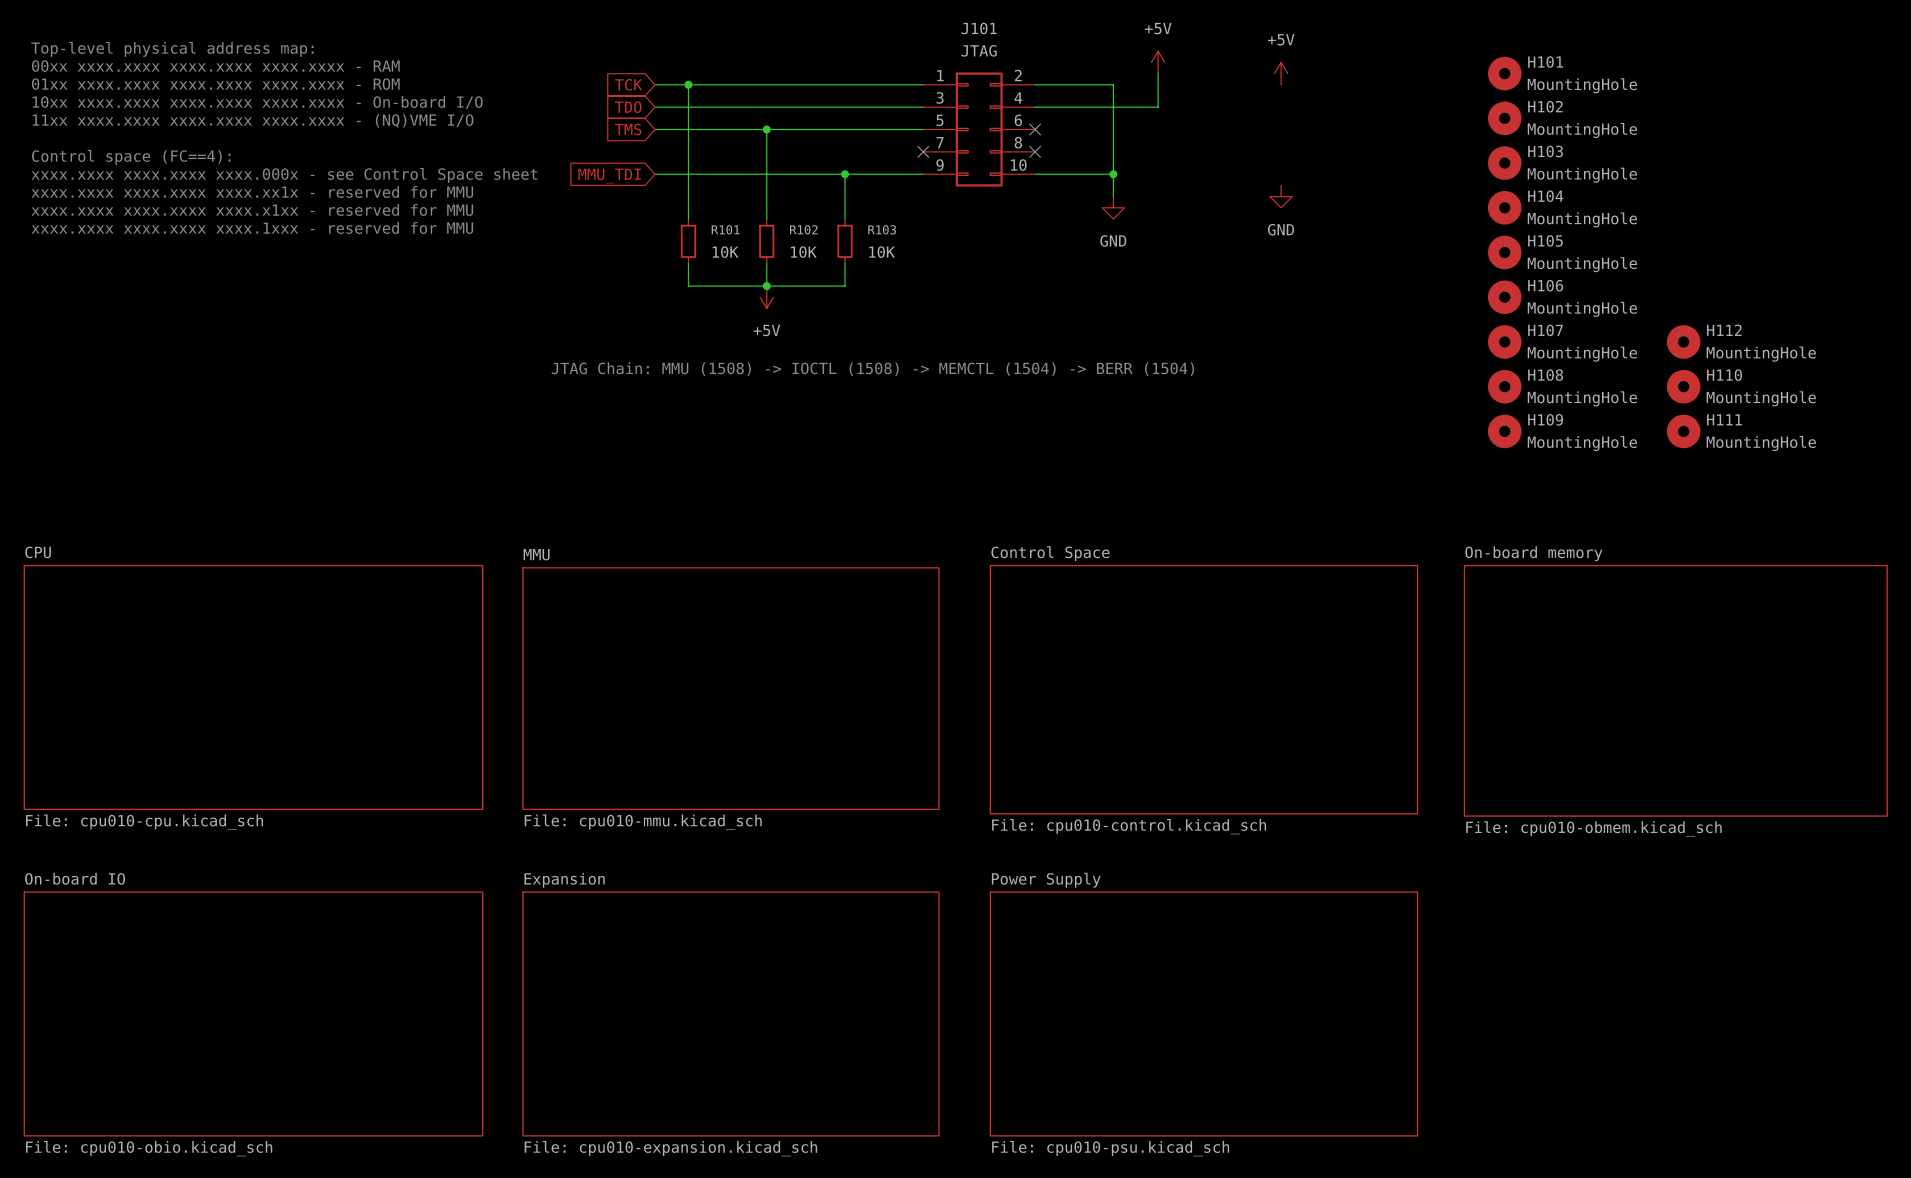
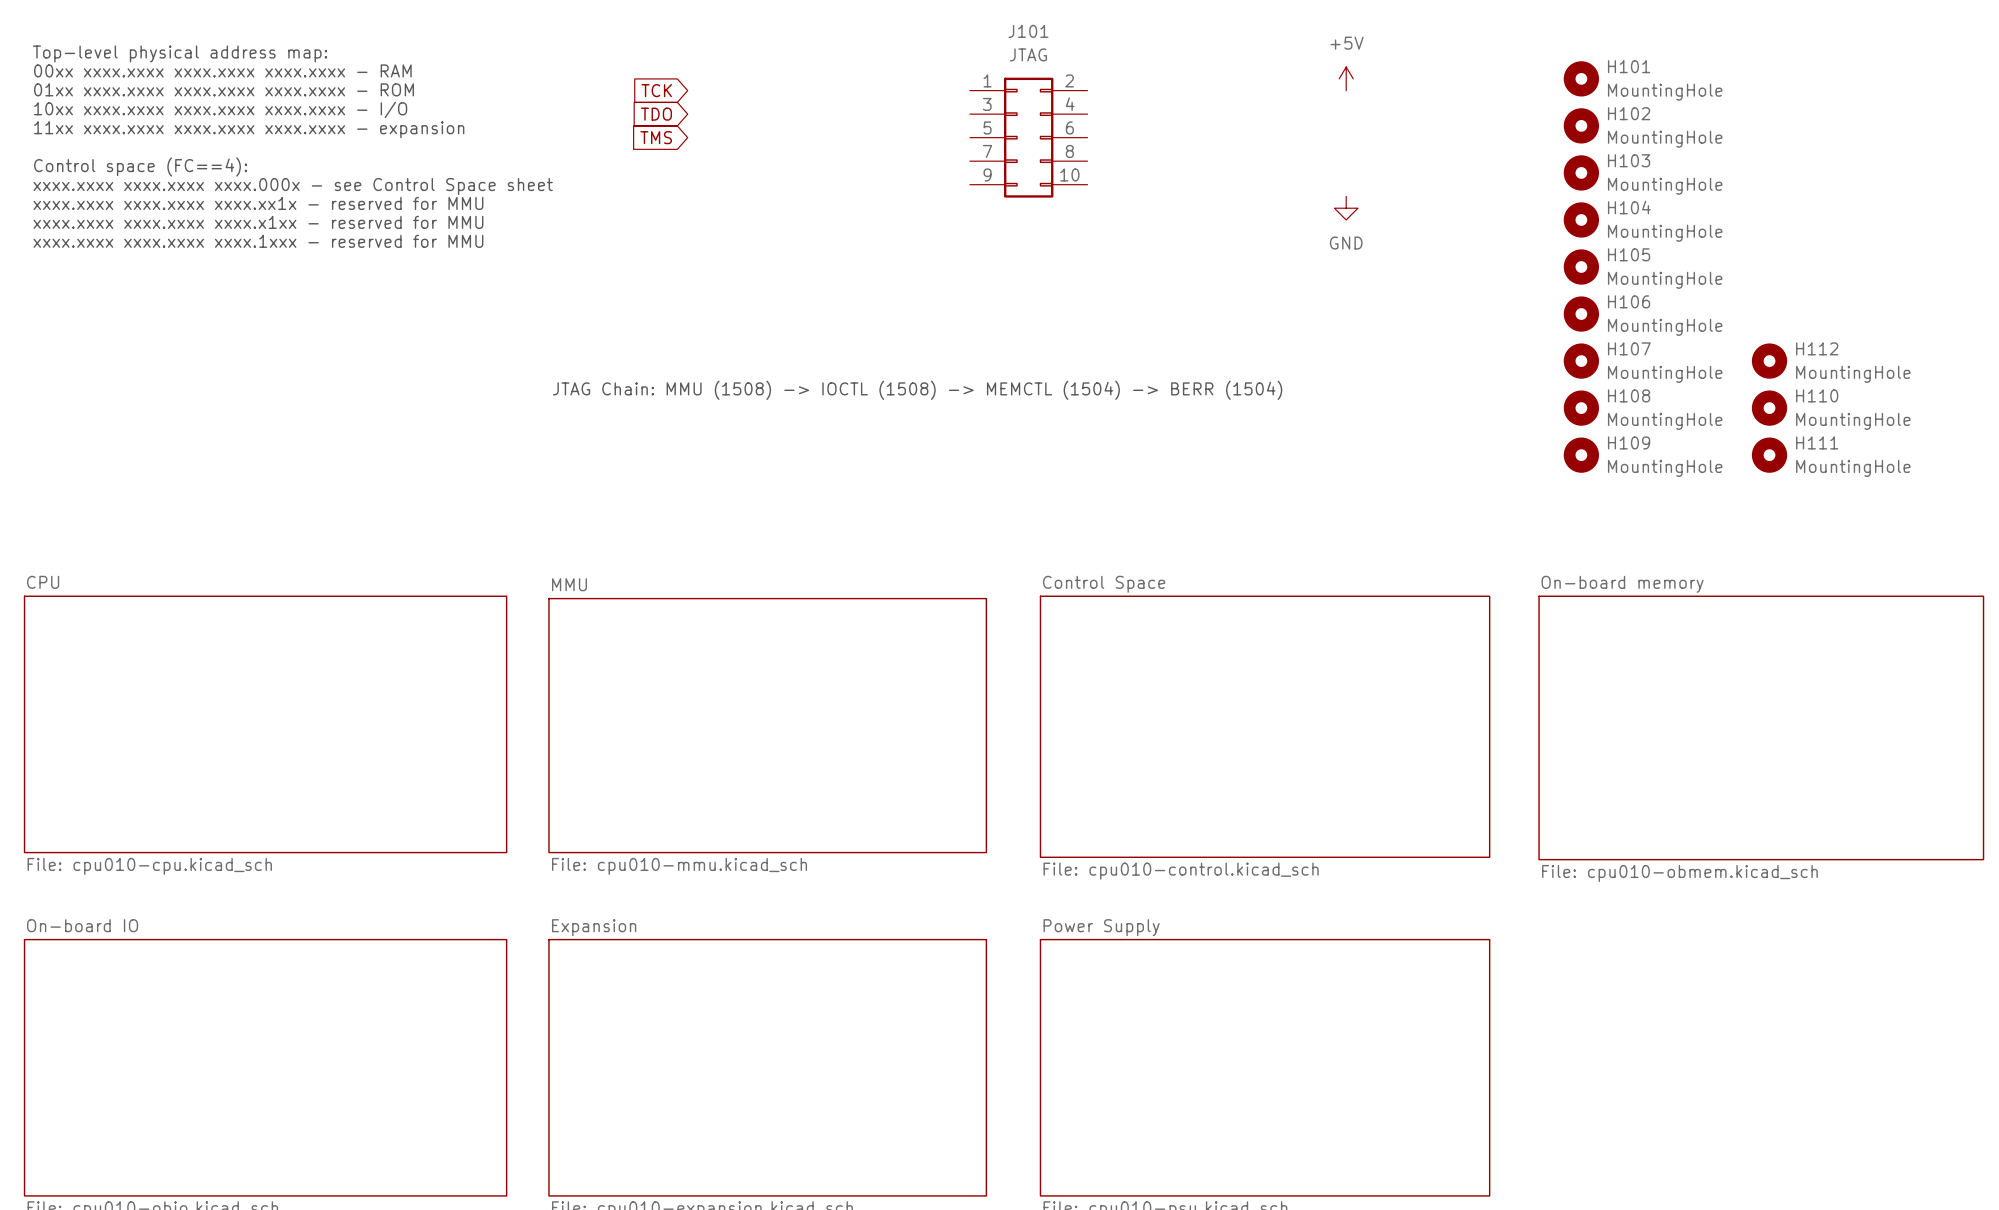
power symbol: +5V (1158, 62) -> none
wire: (1158, 73) (1158, 107) (1035, 107) -> none
wire: (654, 84) (923, 84) -> none
wire: (688, 84) (688, 218) -> none
junction: (688, 84) -> none
wire: (1035, 84) (1113, 84) (1113, 196) -> none
text: 10xx xxxx.xxxx xxxx.xxxx xxxx.xxxx - On-board I/O (257, 102) -> 10xx xxxx.xxxx xxxx.xxxx xxxx.xxxx - I/O (220, 109)
wire: (654, 107) (923, 107) -> none
text: 11xx xxxx.xxxx xxxx.xxxx xxxx.xxxx - (NQ)VME I/O (253, 120) -> 11xx xxxx.xxxx xxxx.xxxx xxxx.xxxx - expansion (249, 129)
wire: (654, 129) (923, 129) -> none
wire: (766, 129) (766, 218) -> none
junction: (766, 129) -> none
no-connect mark: (1035, 129) -> none
no-connect mark: (923, 151) -> none
no-connect mark: (1035, 151) -> none
wire: (654, 174) (923, 174) -> none
wire: (845, 174) (845, 218) -> none
junction: (845, 174) -> none
wire: (1035, 174) (1113, 174) -> none
junction: (1113, 174) -> none
global label: MMU_TDI (609, 176) -> none
power symbol: GND (1113, 207) -> none
R101: 10K (688, 241) -> none
R102: 10K (766, 241) -> none
R103: 10K (845, 241) -> none
wire: (688, 263) (688, 286) (845, 286) (845, 263) -> none
wire: (766, 263) (766, 286) -> none
junction: (766, 286) -> none
power symbol: +5V (766, 297) -> none

